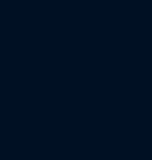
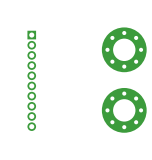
part: none -> (124, 49)
part: none -> (31, 80)
part: none -> (124, 110)

